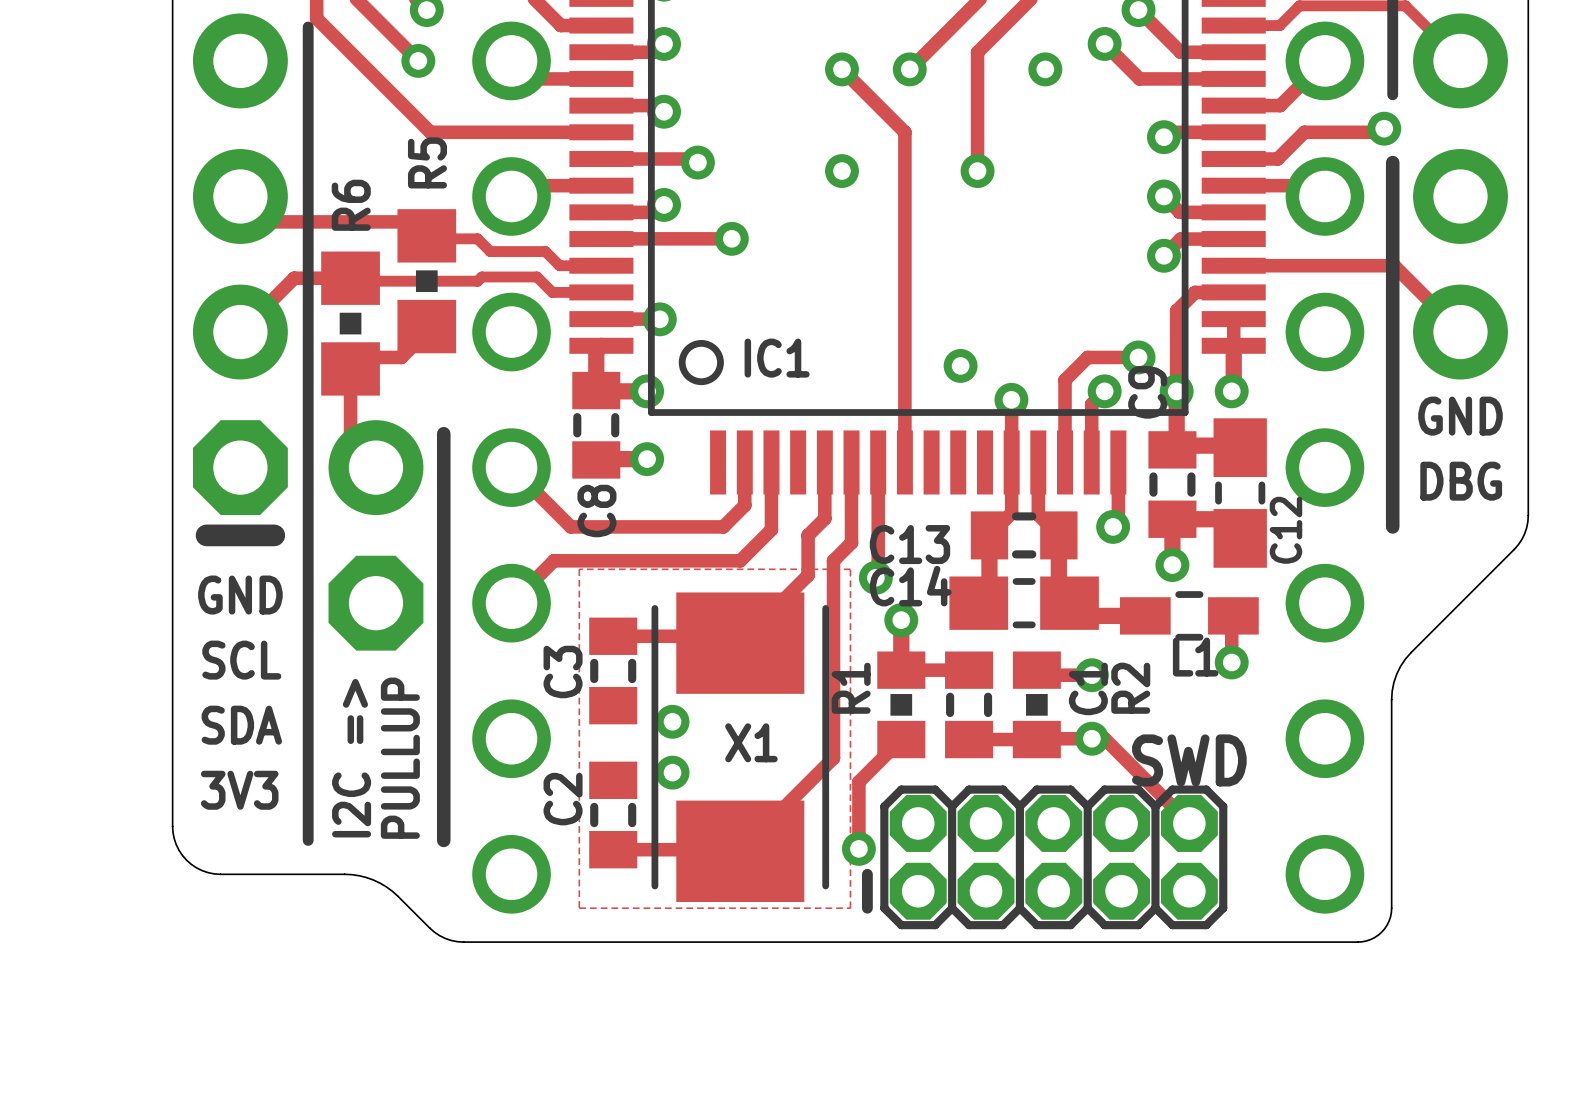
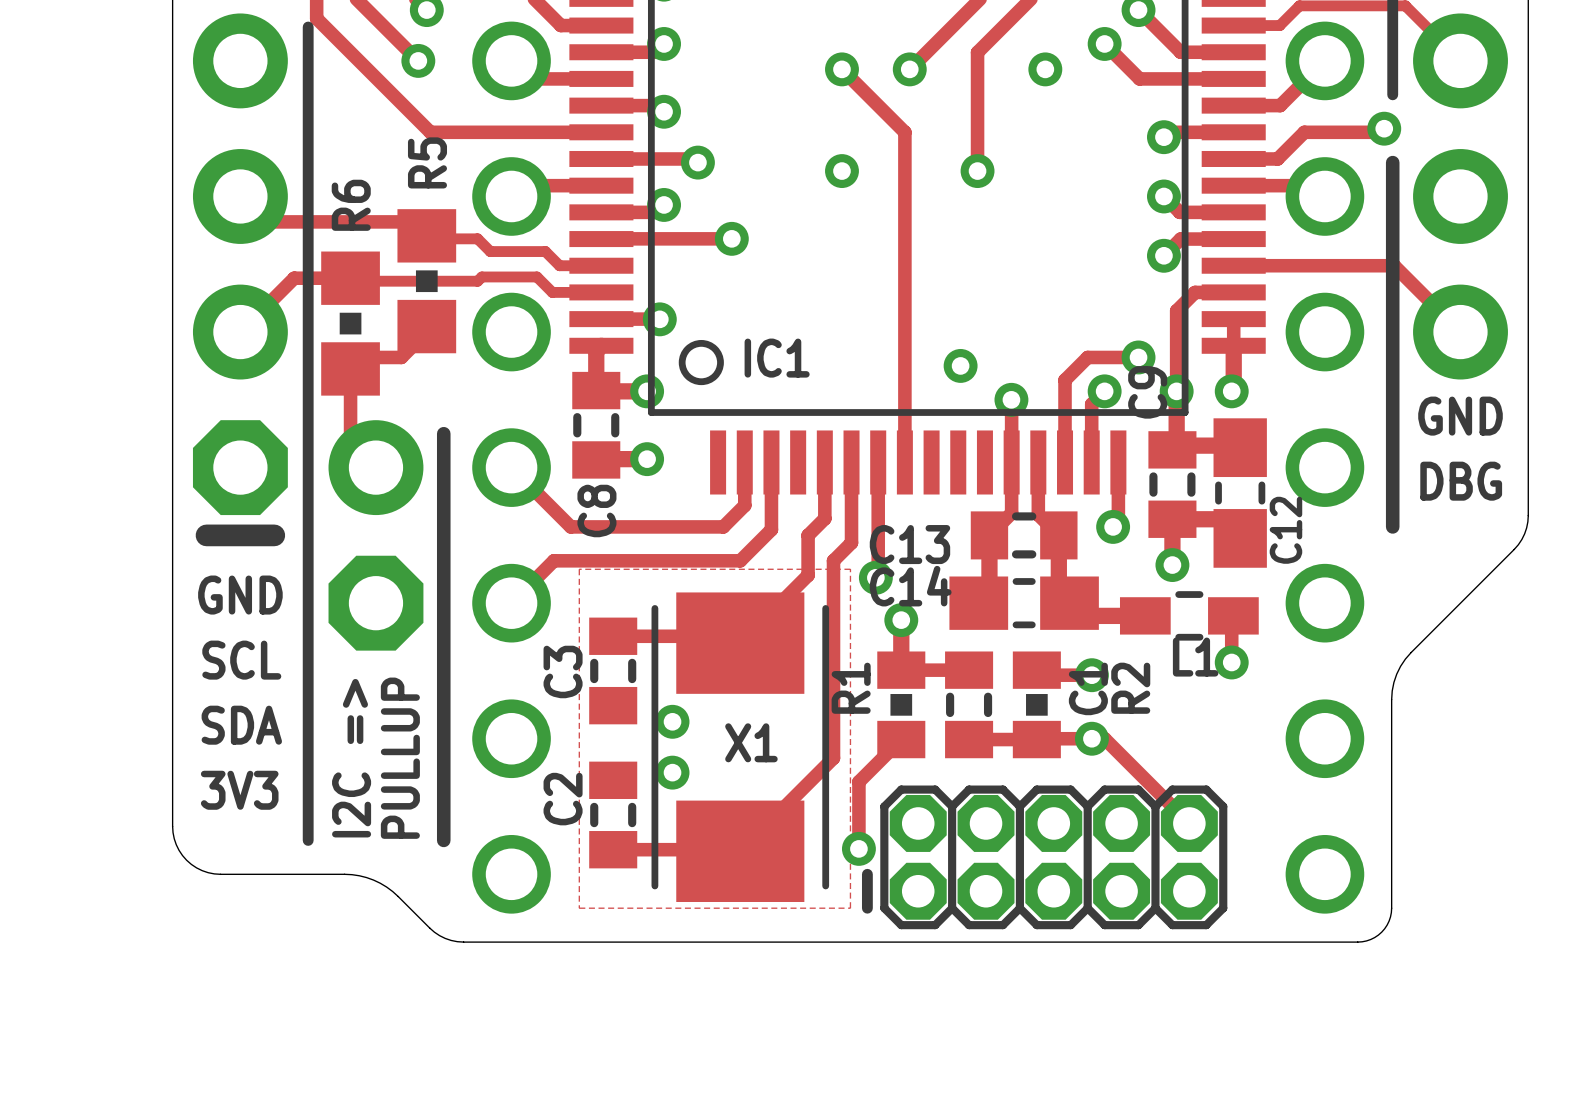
text: SWD (1189, 760) -> none

